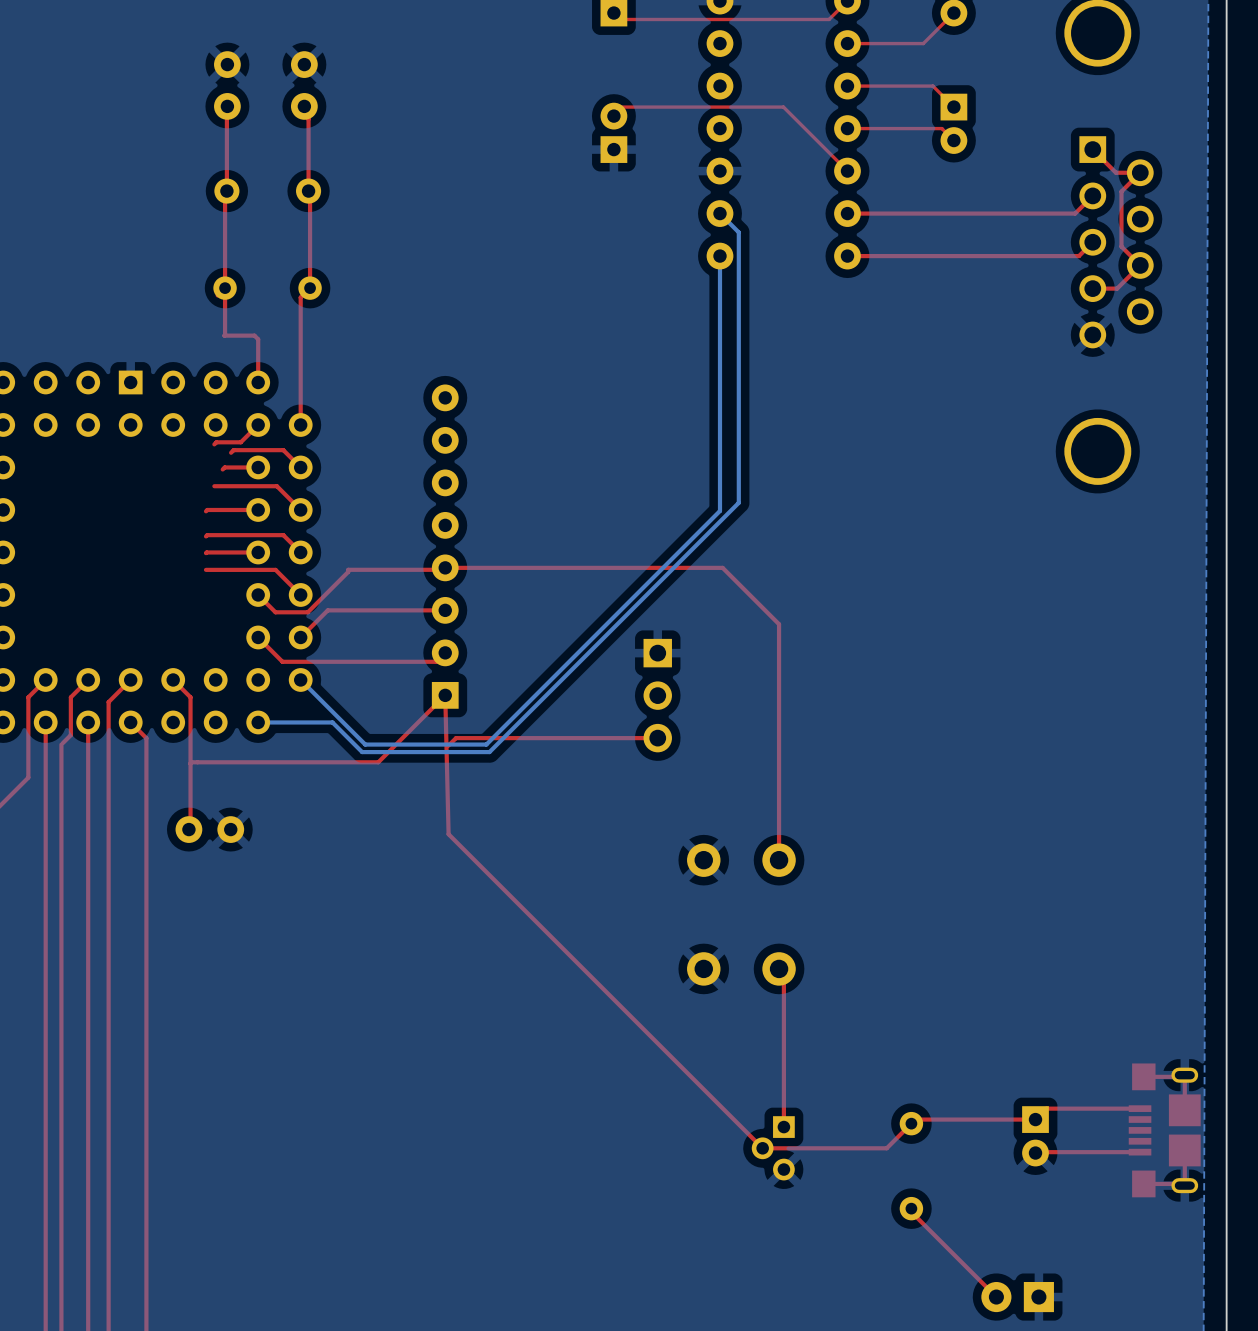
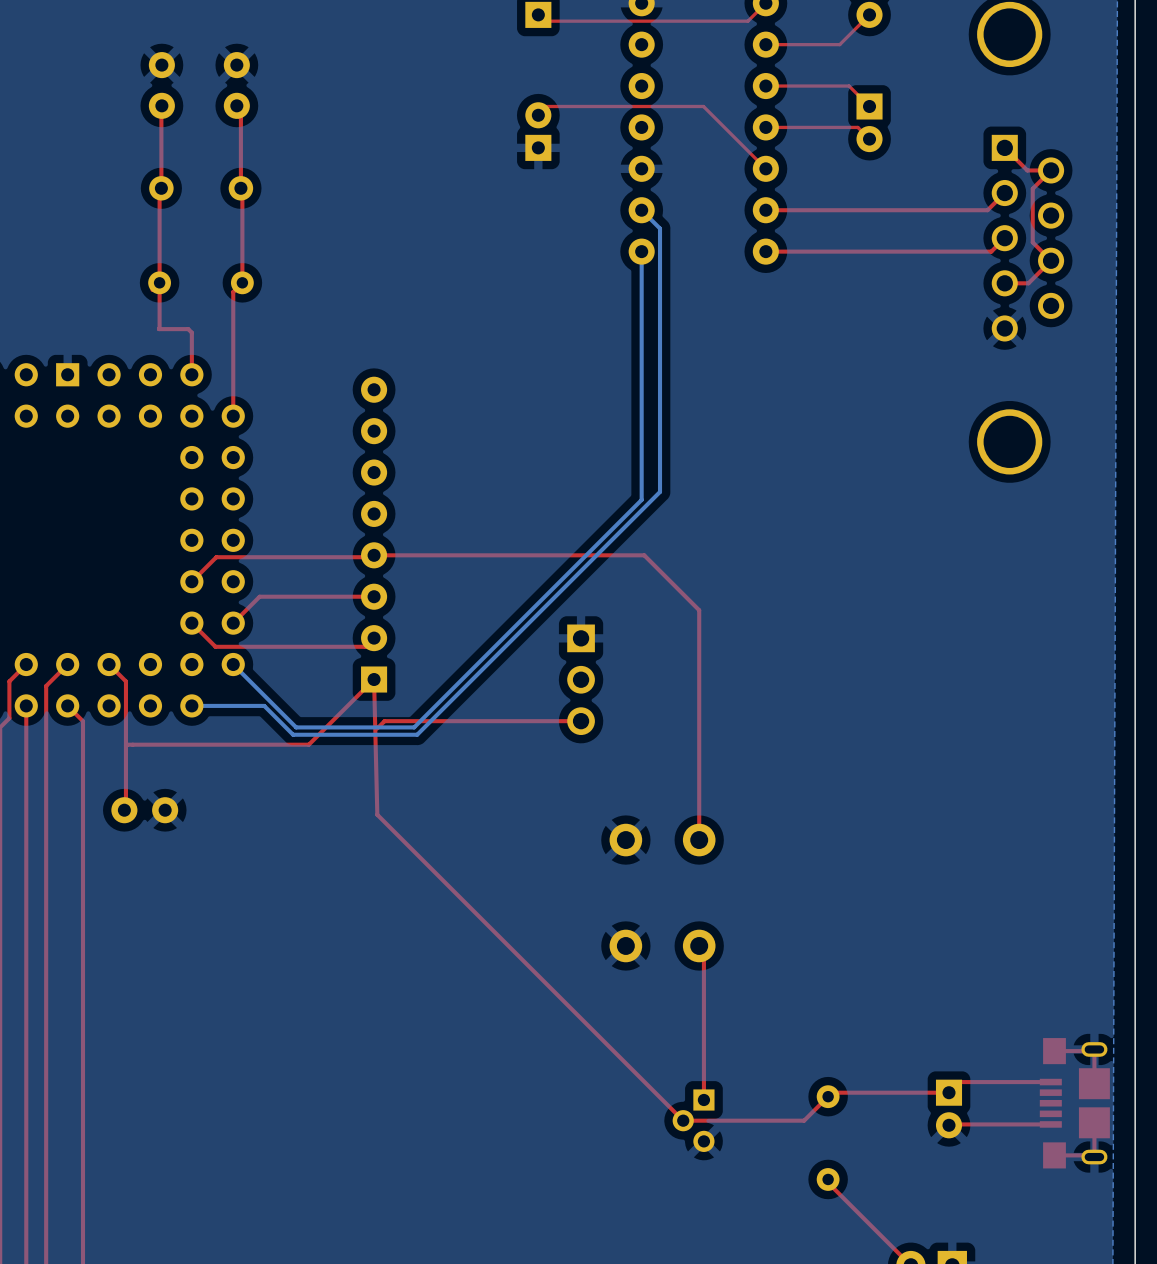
top track: (258, 424) (240, 442) (216, 442) (214, 444) -> none
top track: (231, 452) (233, 450) (283, 450) (300, 467) -> none
top track: (258, 467) (224, 467) (222, 469) -> none
top track: (214, 486) (276, 486) (300, 509) -> none
top track: (258, 509) (205, 511) -> none
top track: (205, 536) (283, 535) (300, 552) -> none
top track: (258, 552) (205, 553) -> none
top track: (205, 569) (275, 569) (300, 594) -> none
top track: (348, 569) (307, 612) (275, 612) (258, 594) -> (279, 557) (216, 557) (191, 581)

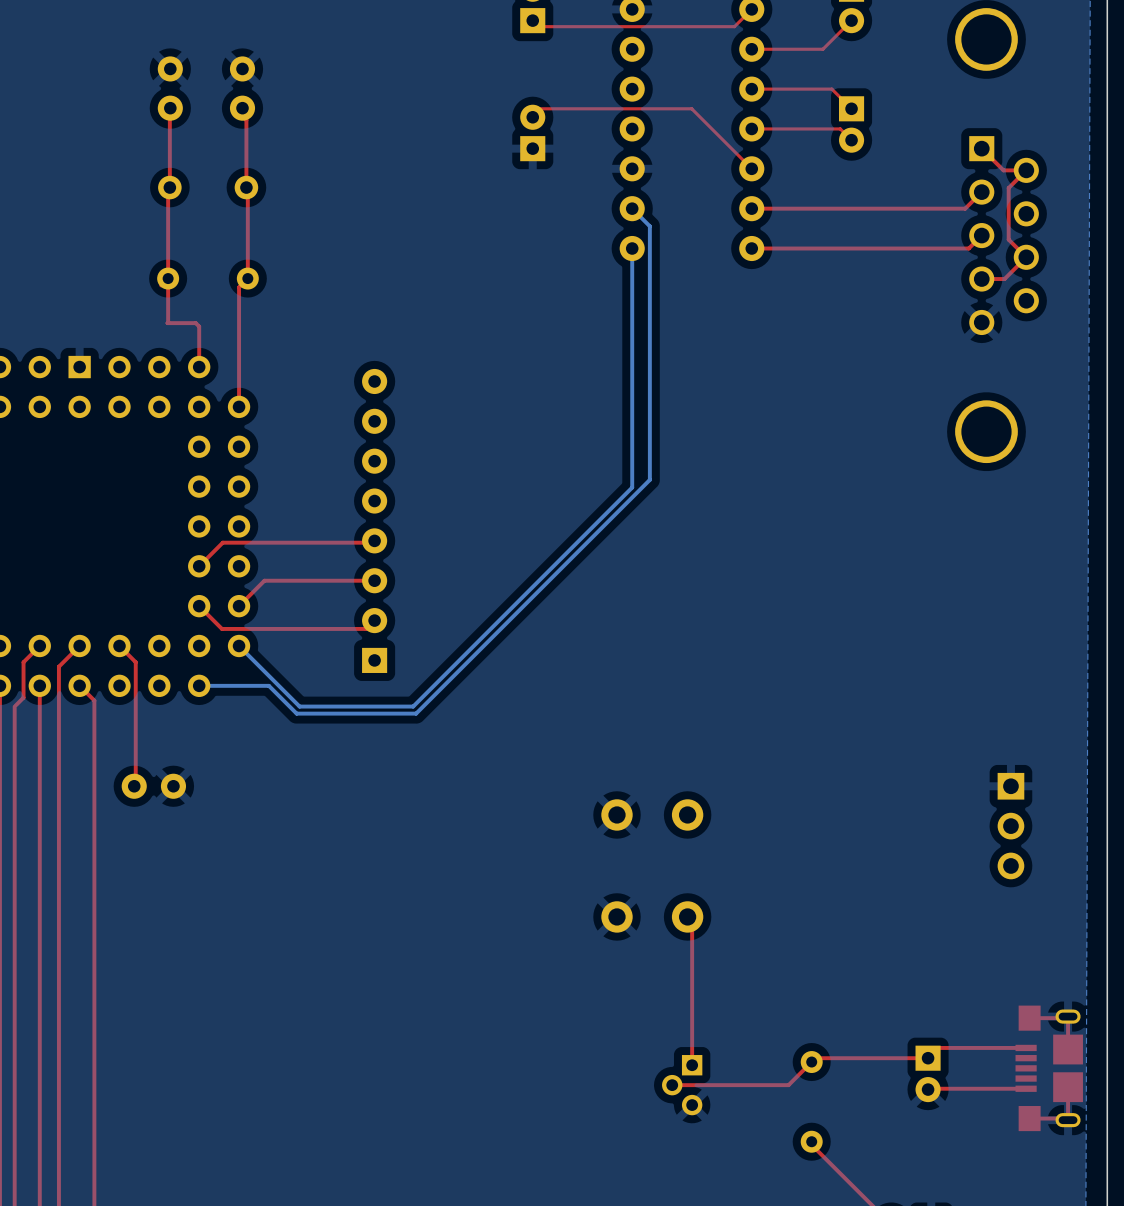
top track: (374, 555) (644, 555) (699, 610) (699, 840) -> none
part: (581, 679) -> none
top track: (581, 721) (384, 721) (377, 728) -> none
top track: (125, 745) (308, 744) (374, 679) (377, 814) (683, 1120) -> none
part: none -> (1010, 826)

